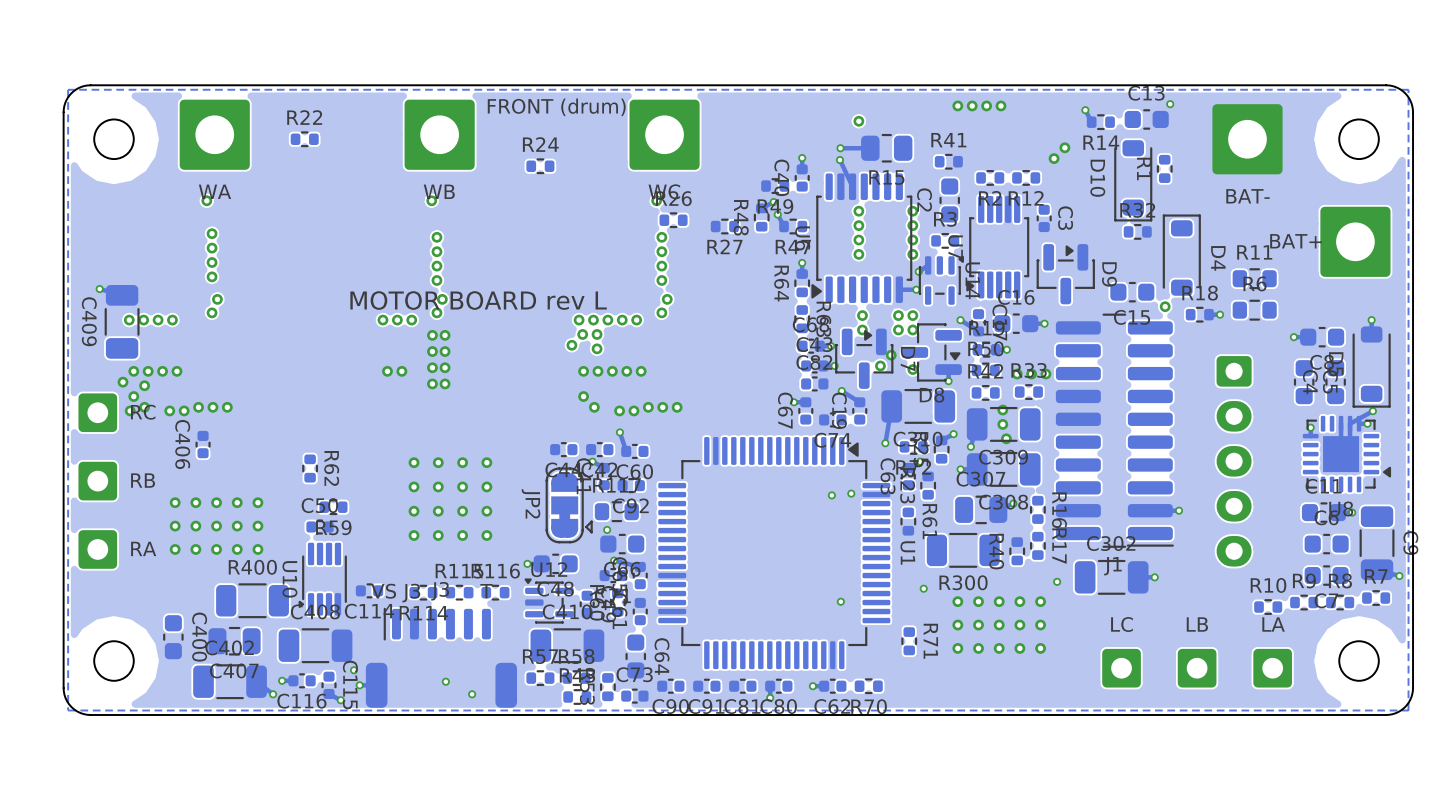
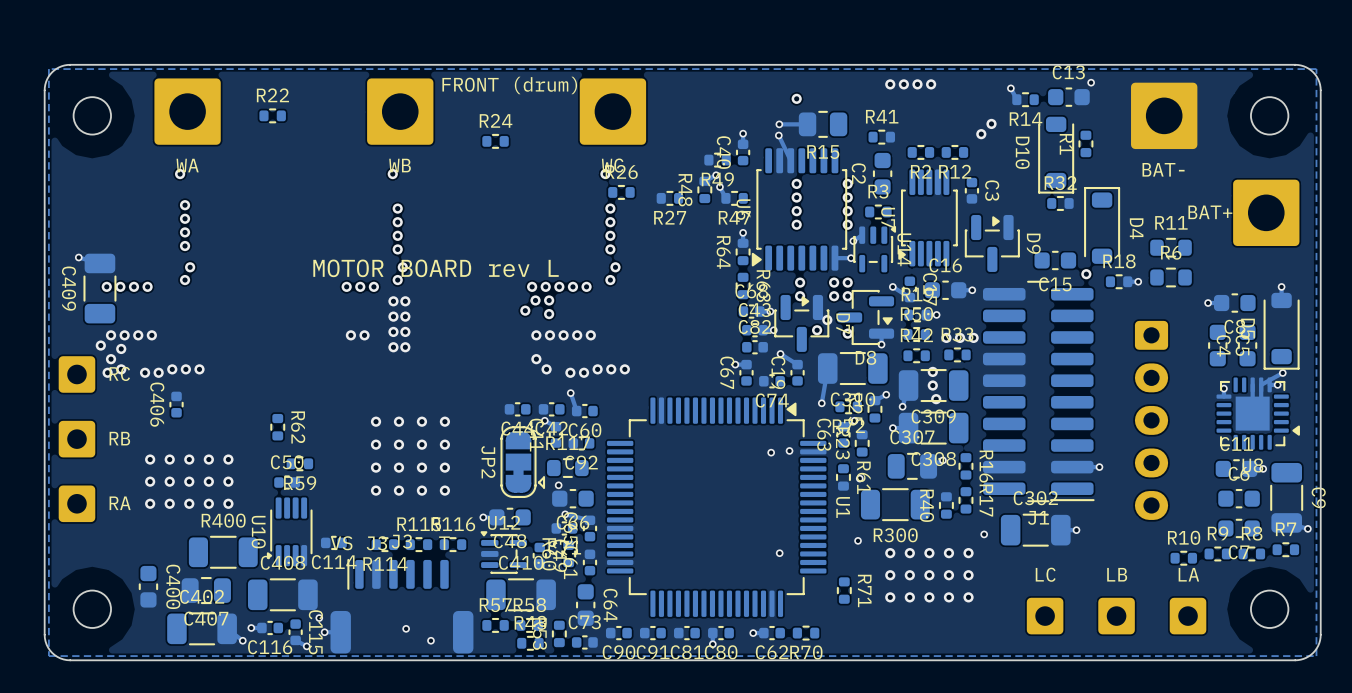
via: none -> (859, 478)

